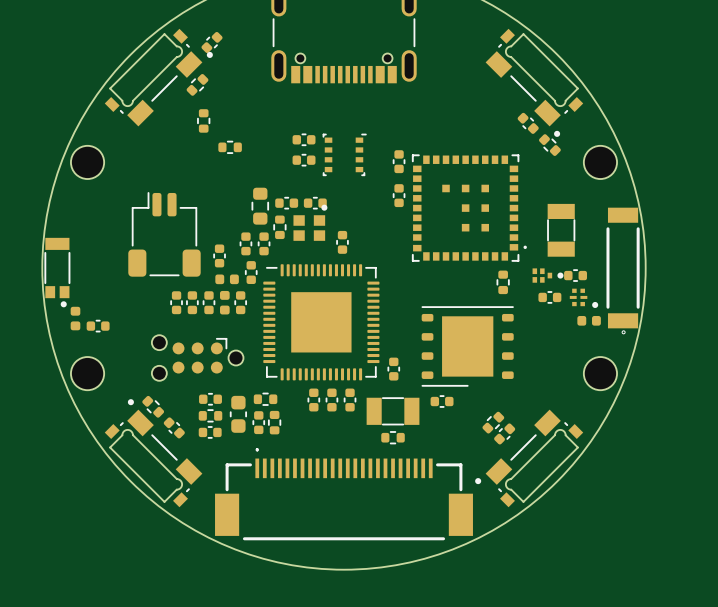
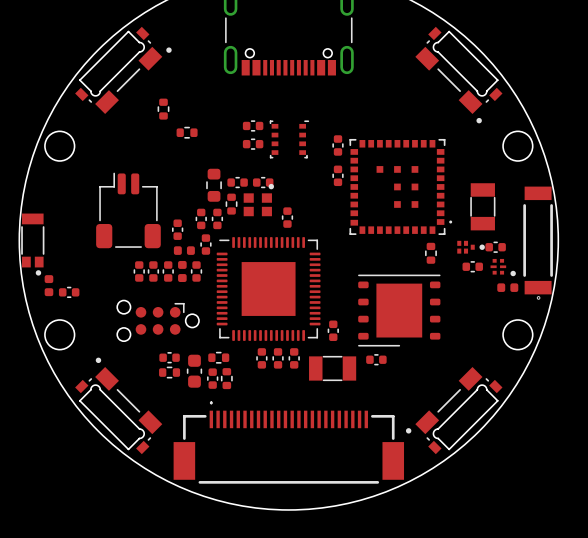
part: (212, 42) -> none
part: (197, 84) -> none
part: (528, 123) -> none
part: (549, 145) -> none
part: (153, 406) -> none
part: (493, 422) -> none
part: (174, 427) -> none
part: (210, 432) -> none
part: (504, 433) -> none
part: (393, 437) -> none

